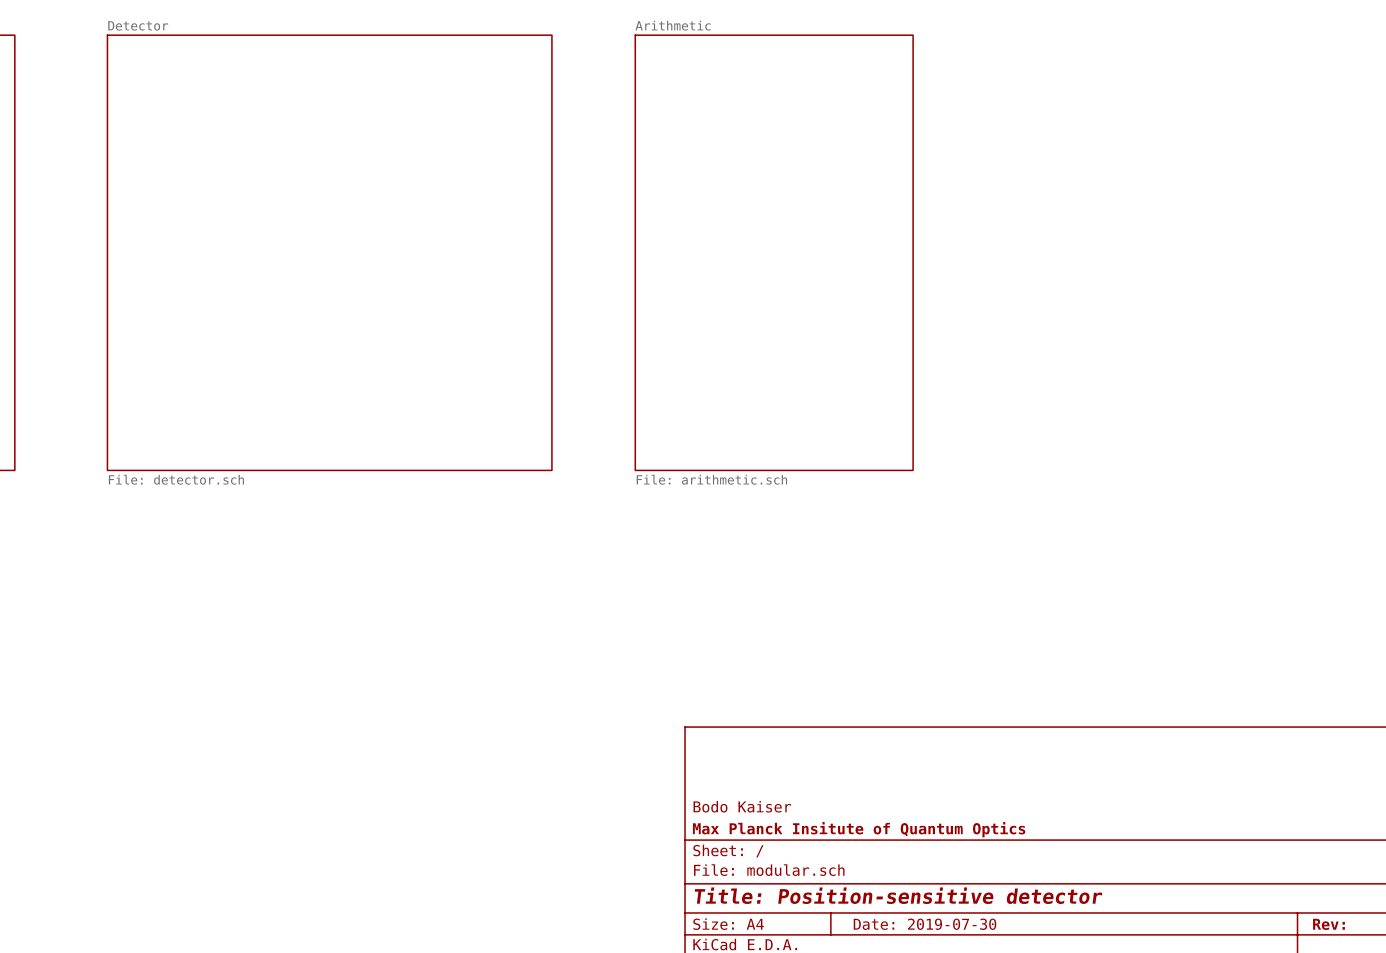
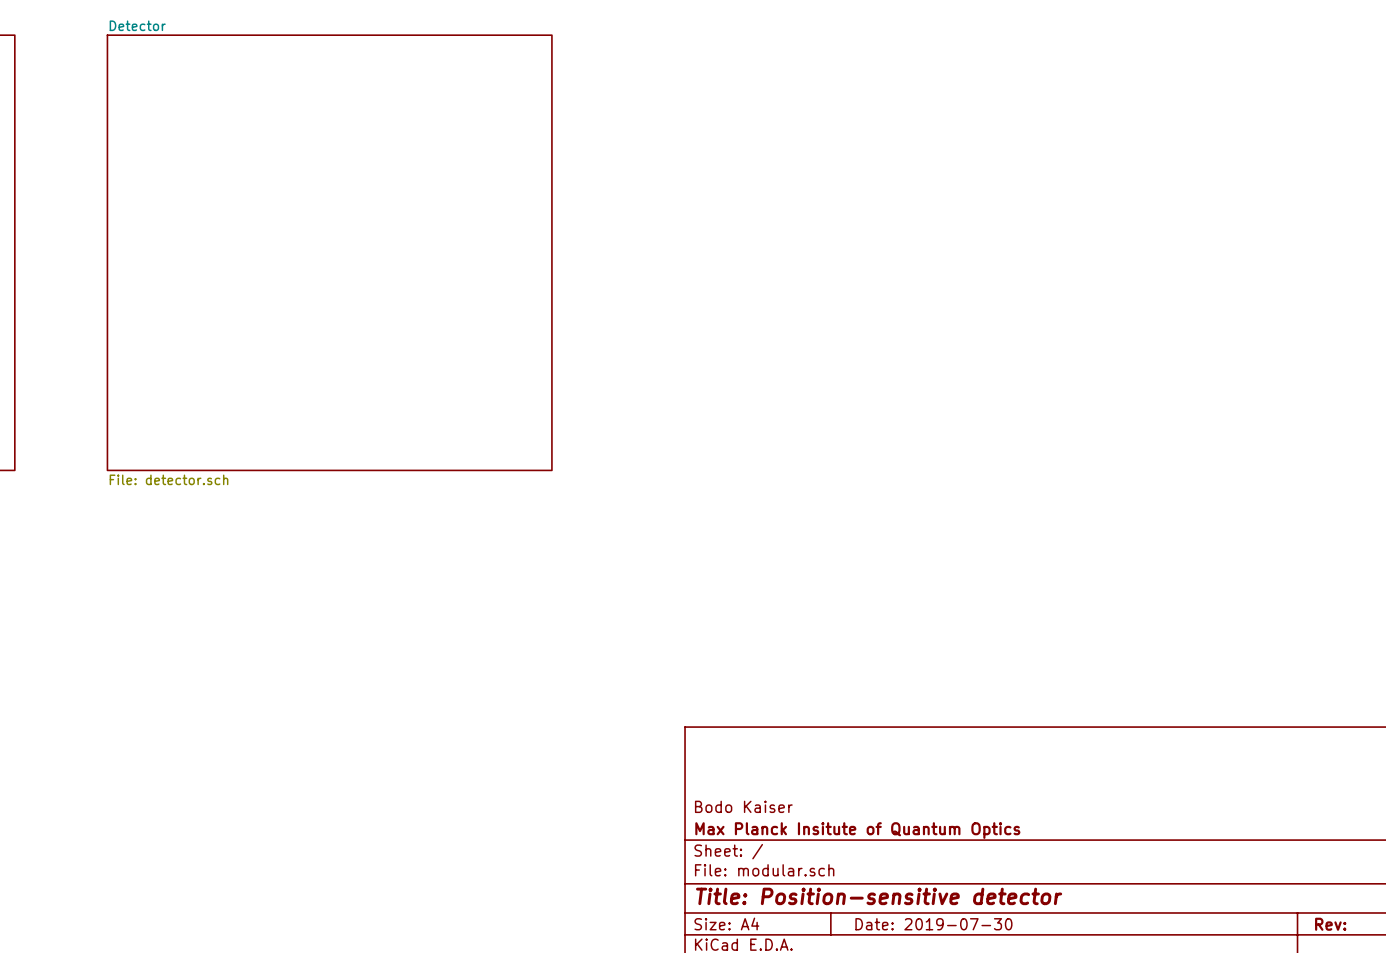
sheet Arithmetic: File: arithmetic.sch (774, 252) -> none

